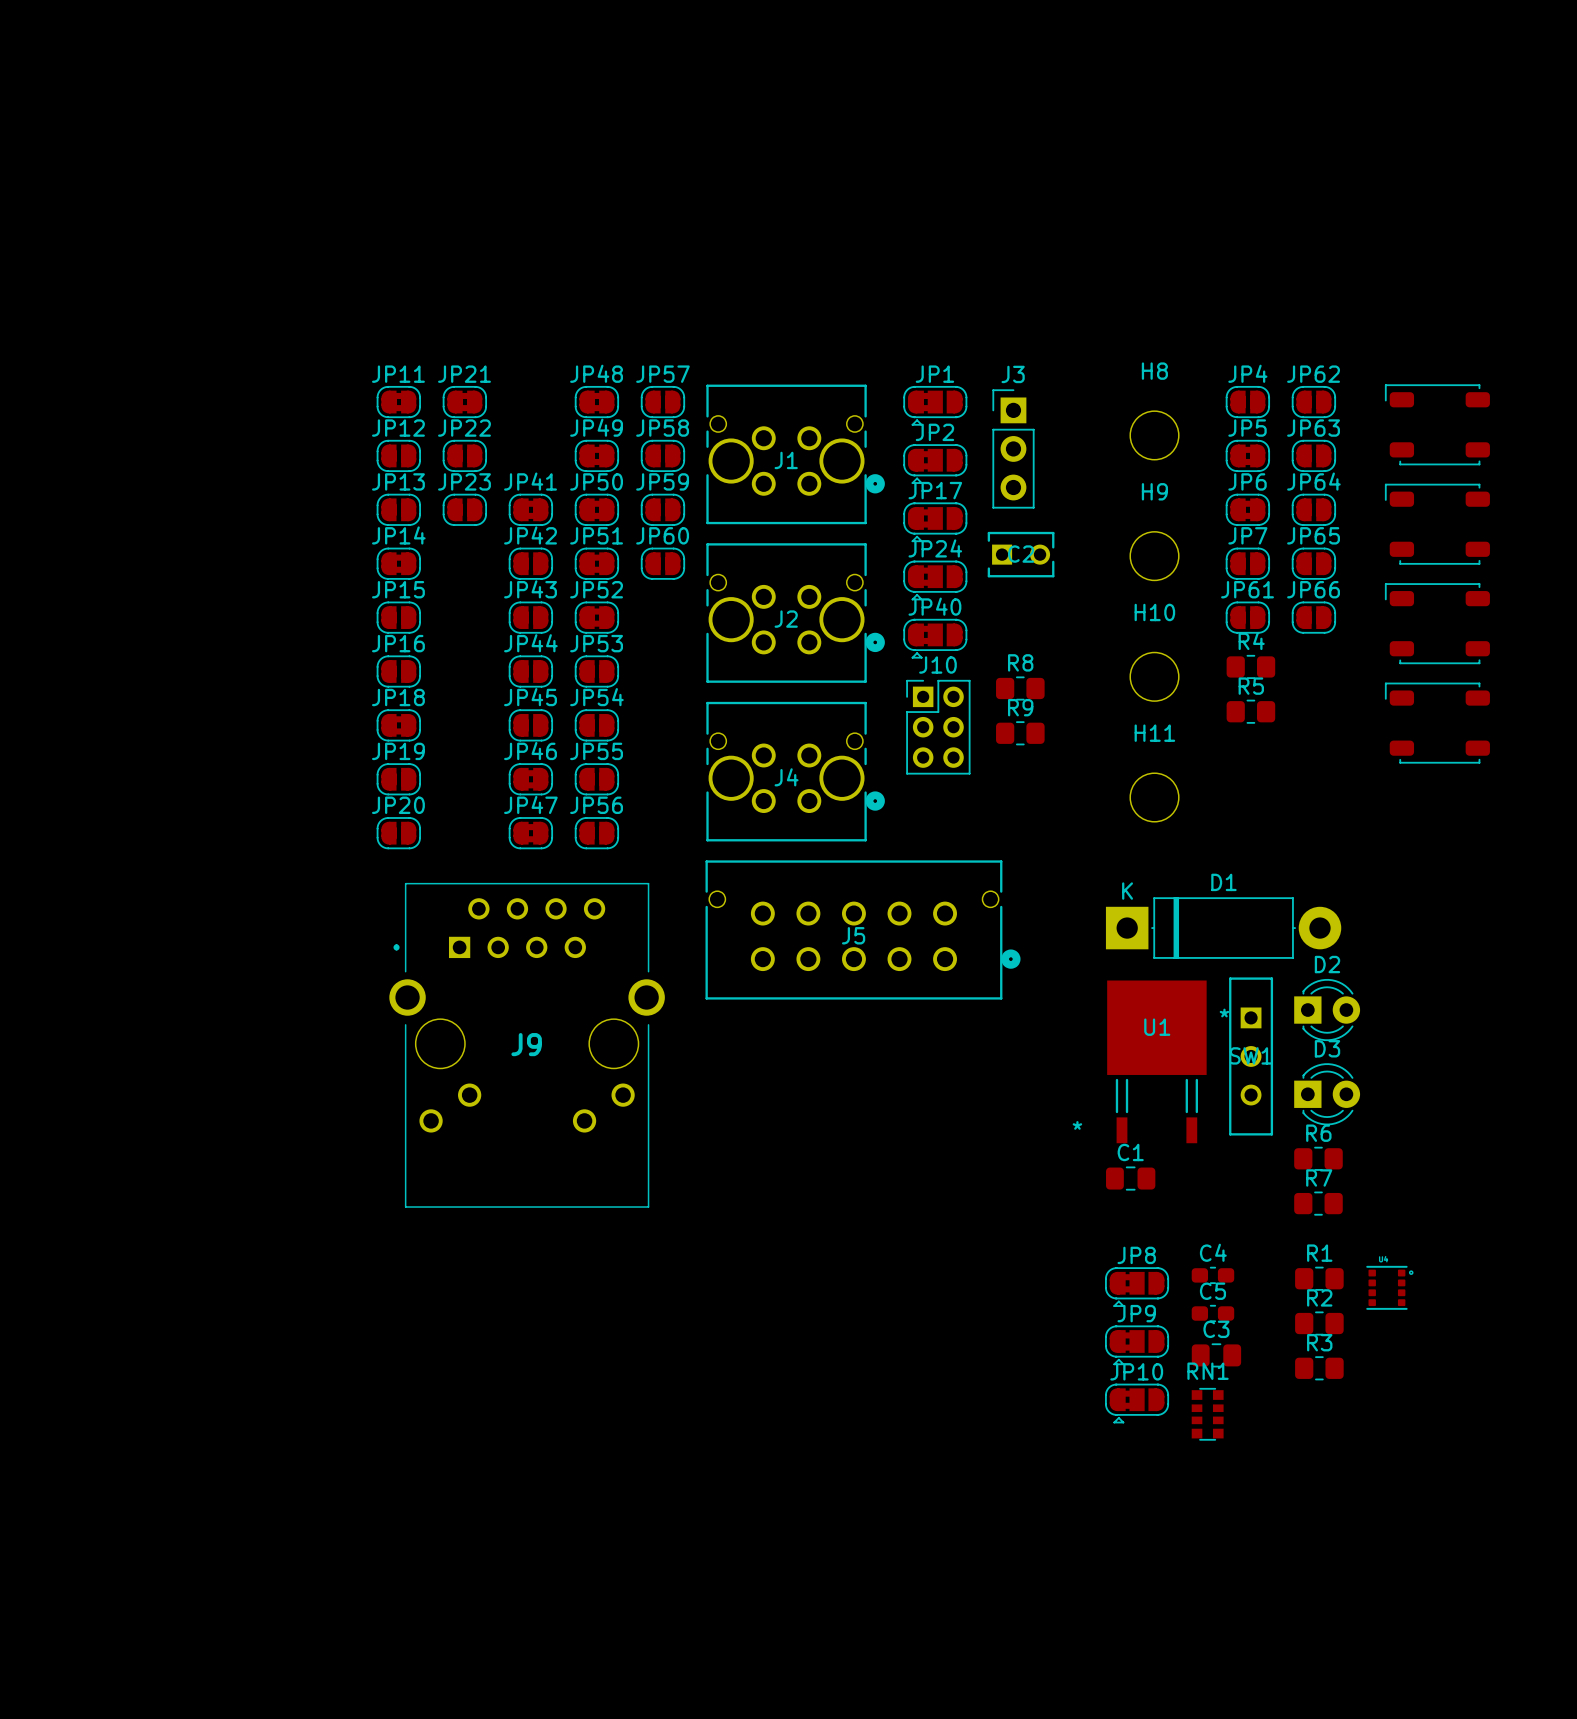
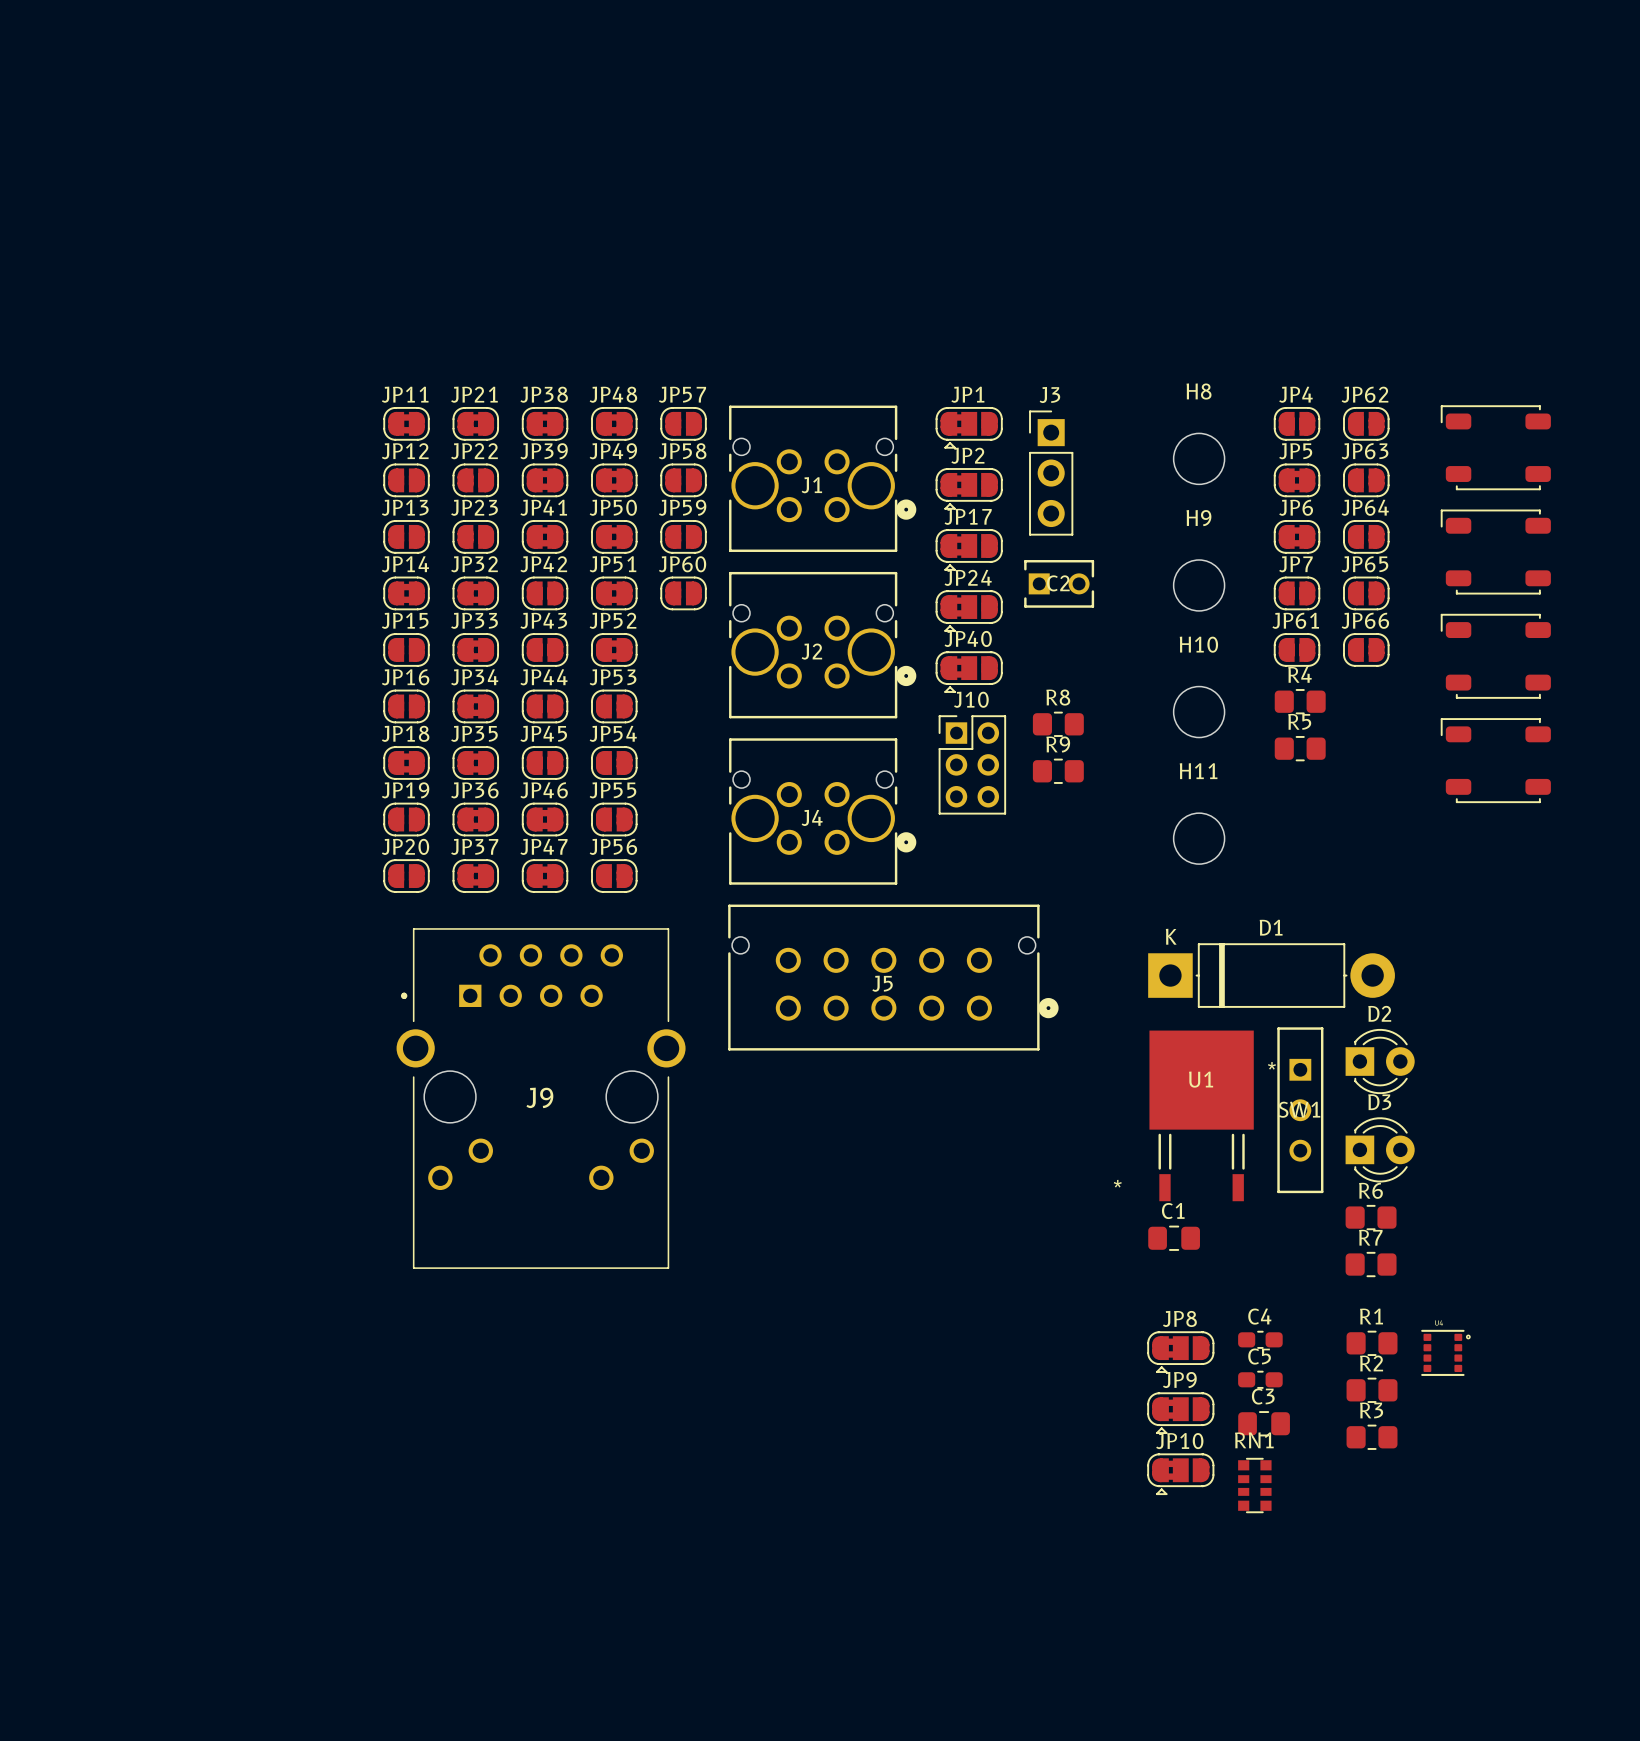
JP38: none -> (545, 423)
JP39: none -> (545, 480)
JP32: none -> (475, 593)
JP33: none -> (475, 649)
JP34: none -> (475, 706)
JP35: none -> (475, 762)
JP36: none -> (475, 819)
JP37: none -> (475, 876)

